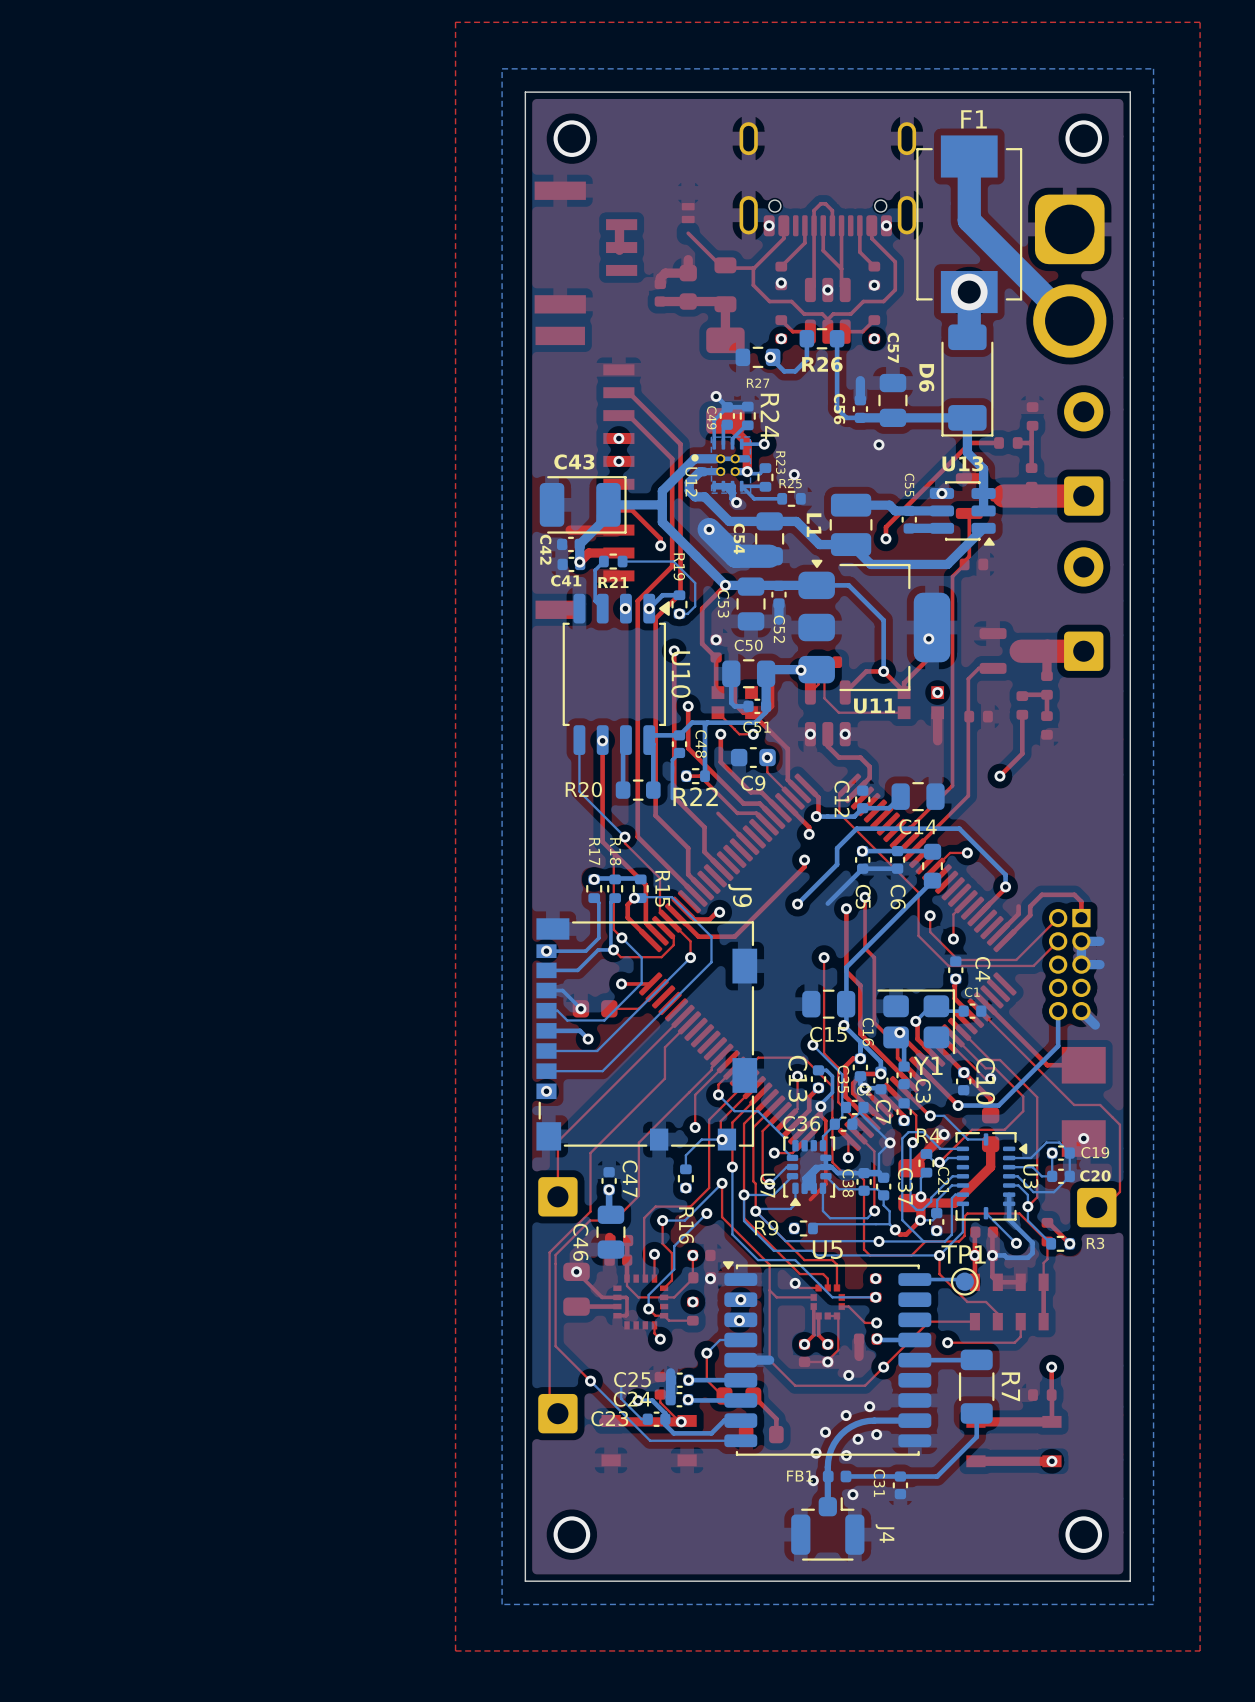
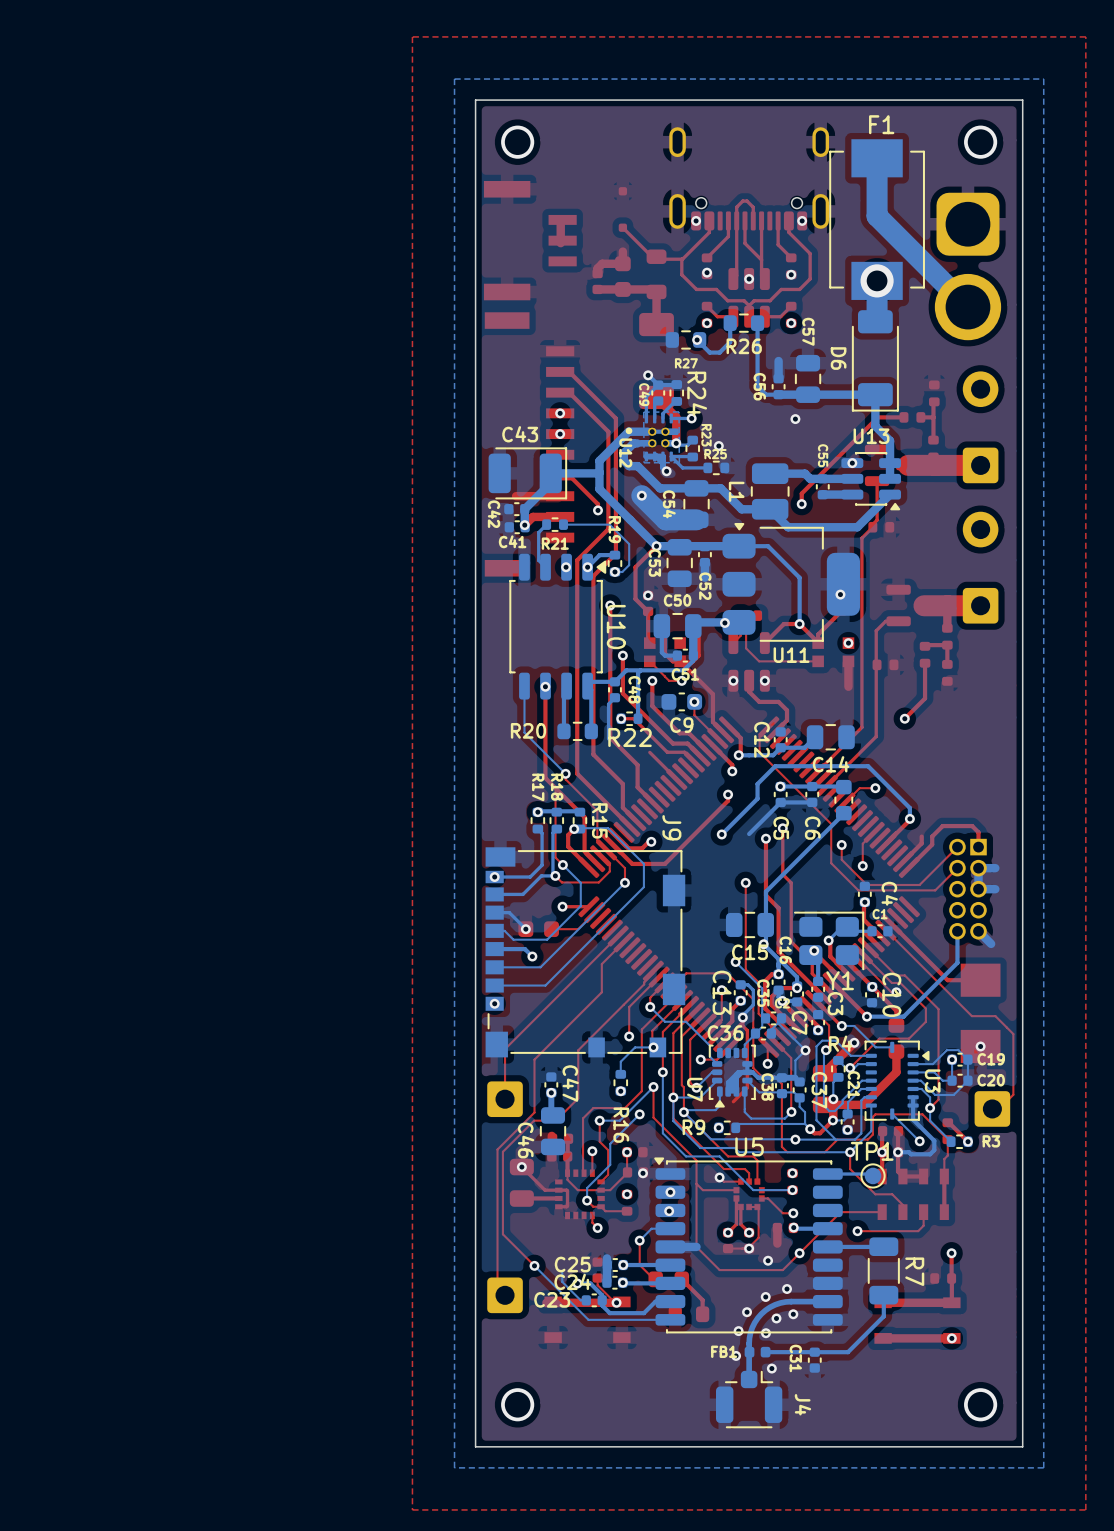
part footprint: [681, 203, 695, 224] -> [618, 187, 628, 232]

